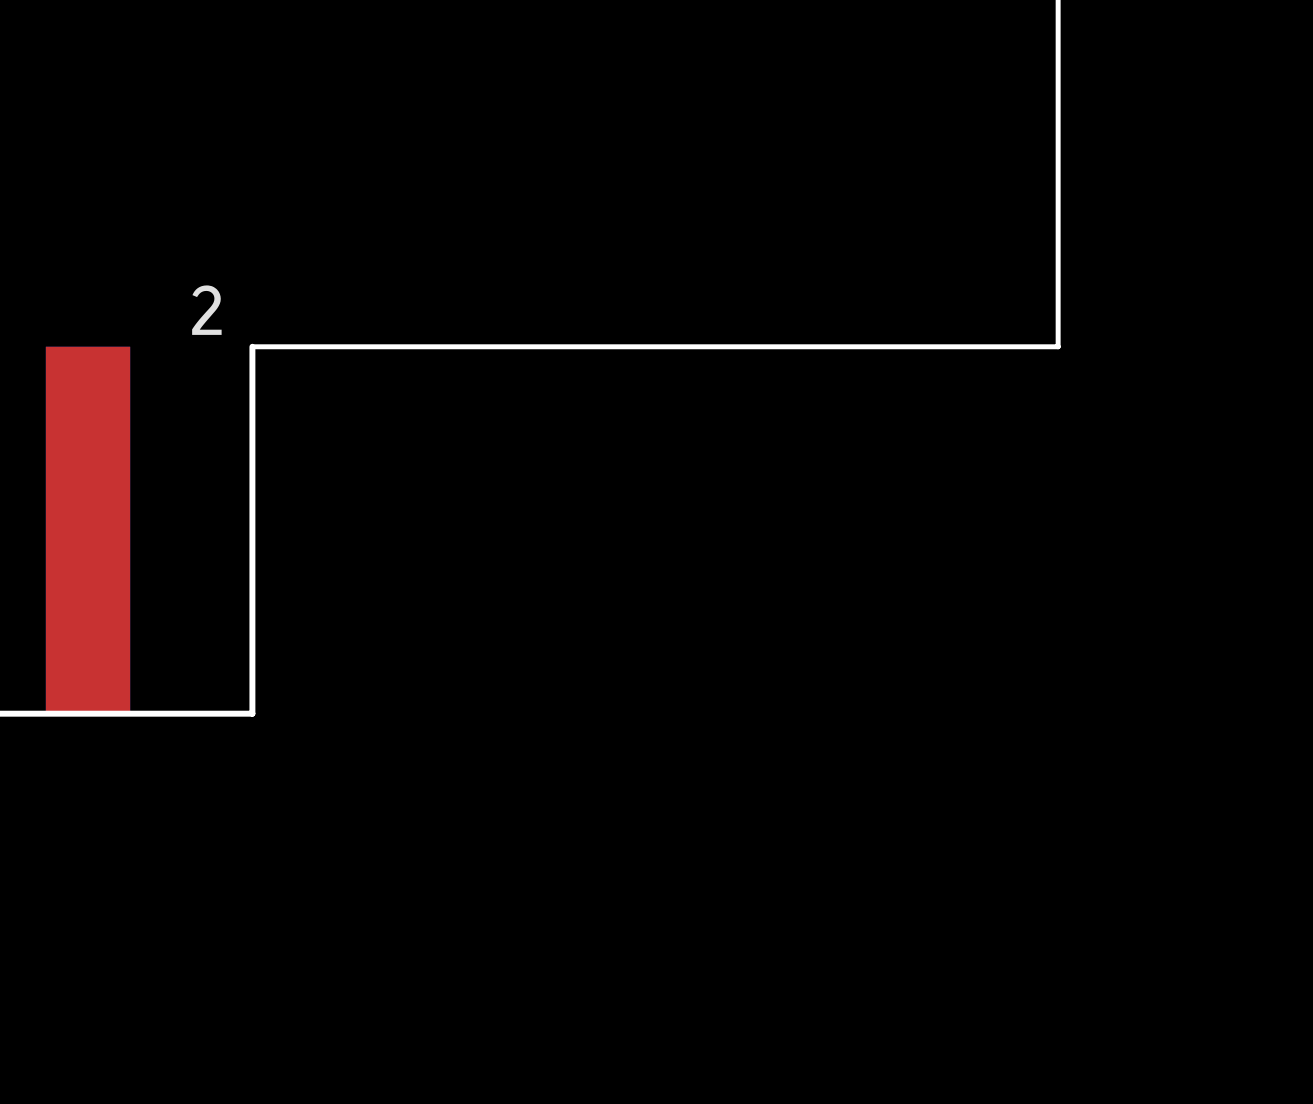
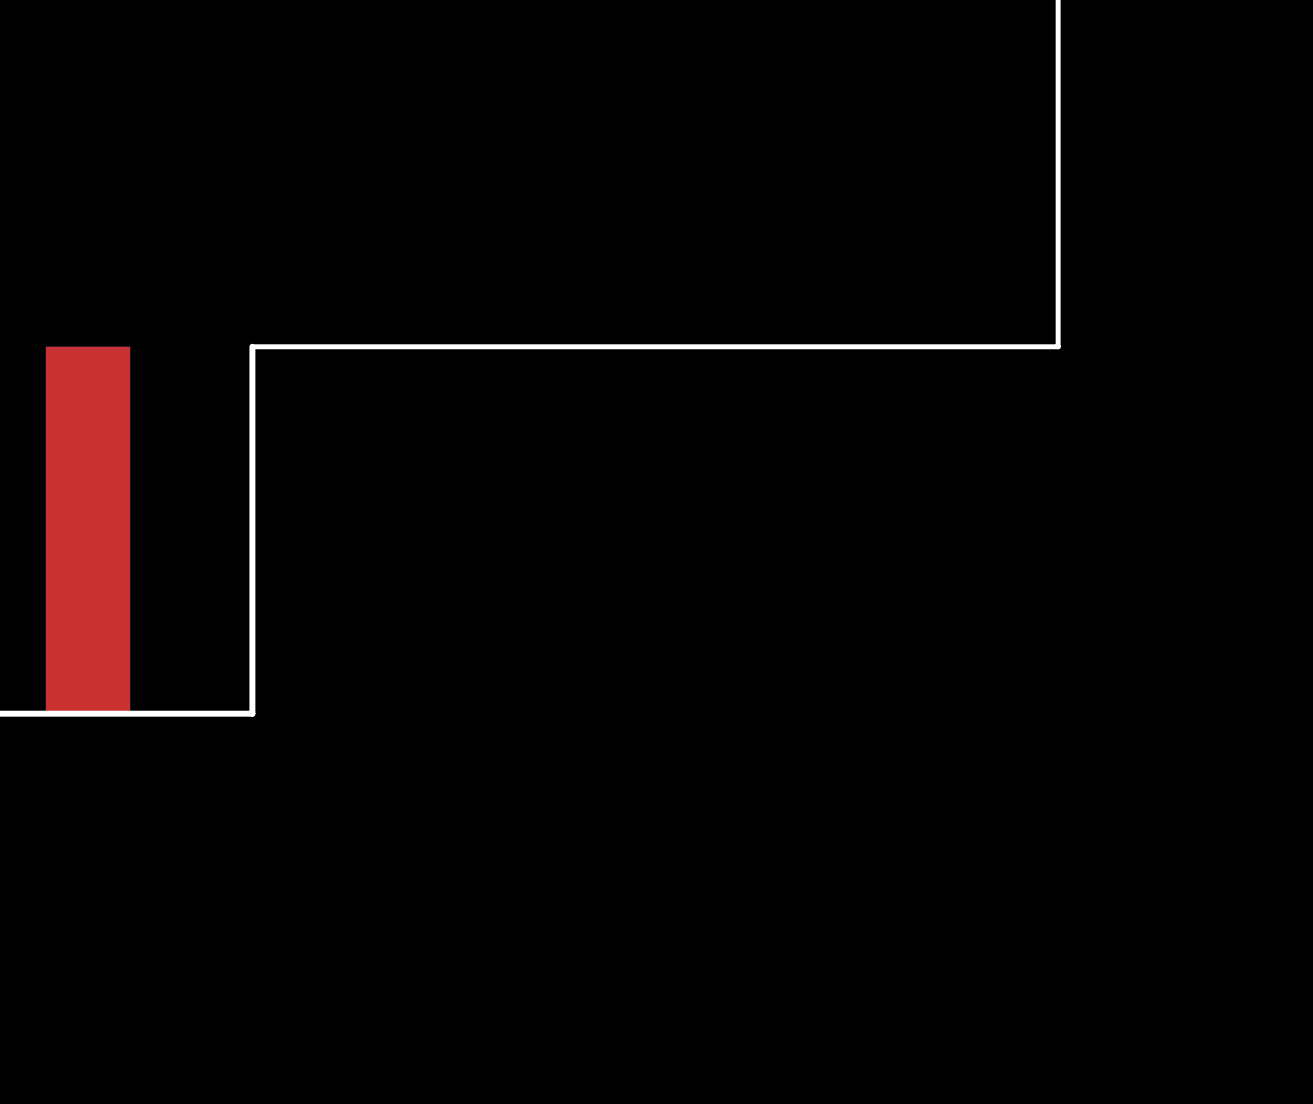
text: 2 (206, 310) -> none

